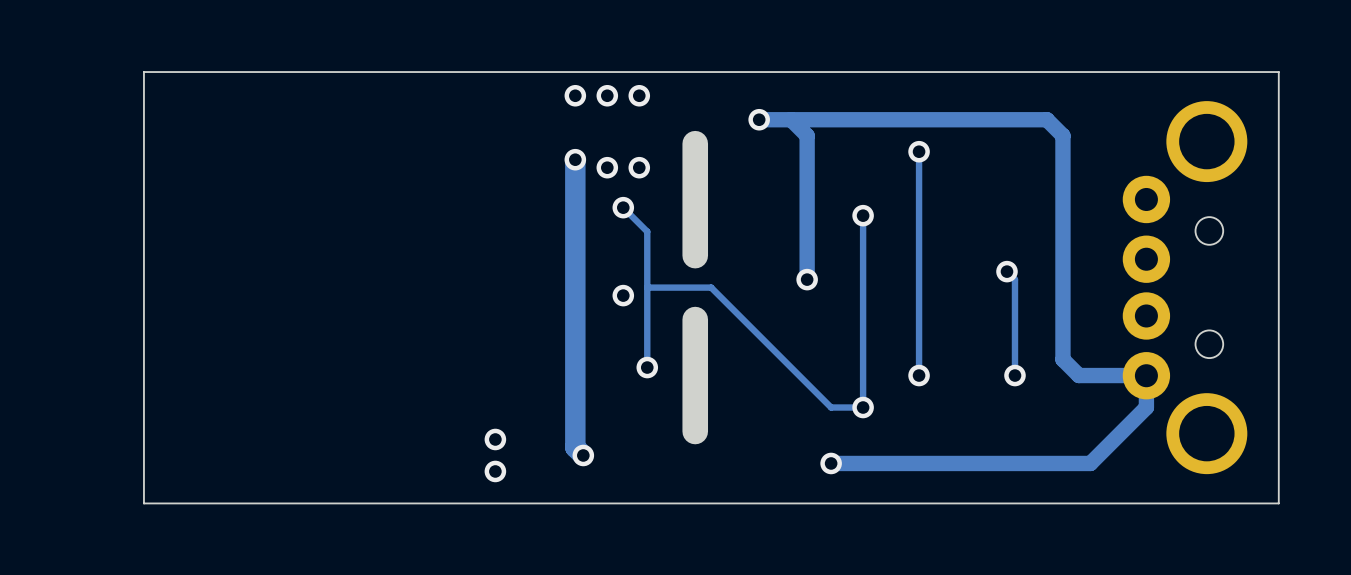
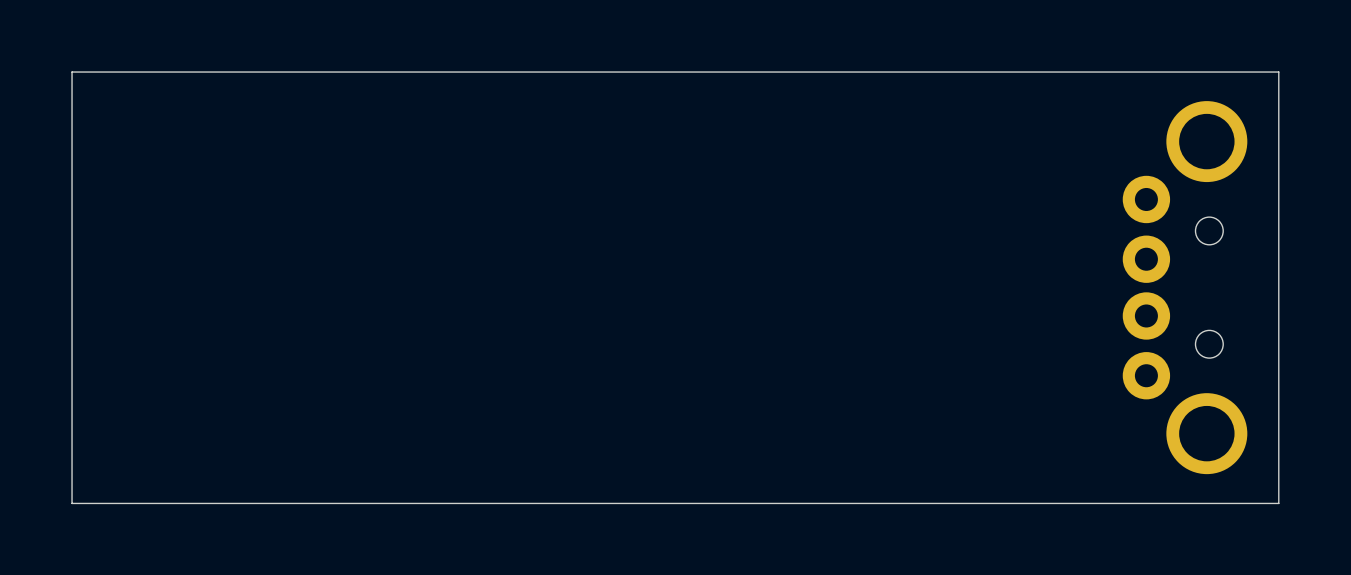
board edge: (143, 72) (143, 503) -> (143, 72) (72, 72) (72, 503) (143, 503)
via: (575, 95) -> none
via: (607, 95) -> none
via: (639, 95) -> none
track: (759, 119) (1046, 119) (1062, 135) (1062, 359) (1078, 375) (1146, 375) -> none
via: (759, 119) -> none
track: (791, 119) (807, 135) (807, 279) -> none
board edge: (695, 143) (695, 255) -> none
track: (919, 151) (919, 375) -> none
via: (919, 151) -> none
track: (575, 159) (575, 447) (583, 455) -> none
via: (575, 159) -> none
via: (607, 167) -> none
via: (639, 167) -> none
track: (623, 207) (647, 231) (647, 367) -> none
via: (623, 207) -> none
track: (863, 215) (863, 407) (831, 407) (711, 287) (647, 287) -> none
via: (863, 215) -> none
track: (1006, 271) (1014, 279) (1014, 375) -> none
via: (1006, 271) -> none
via: (807, 279) -> none
via: (623, 295) -> none
board edge: (695, 319) (695, 431) -> none
via: (647, 367) -> none
via: (919, 375) -> none
via: (1014, 375) -> none
track: (1146, 375) (1146, 407) (1090, 463) (831, 463) -> none
via: (863, 407) -> none
via: (495, 439) -> none
via: (583, 455) -> none
via: (831, 463) -> none
via: (495, 471) -> none

